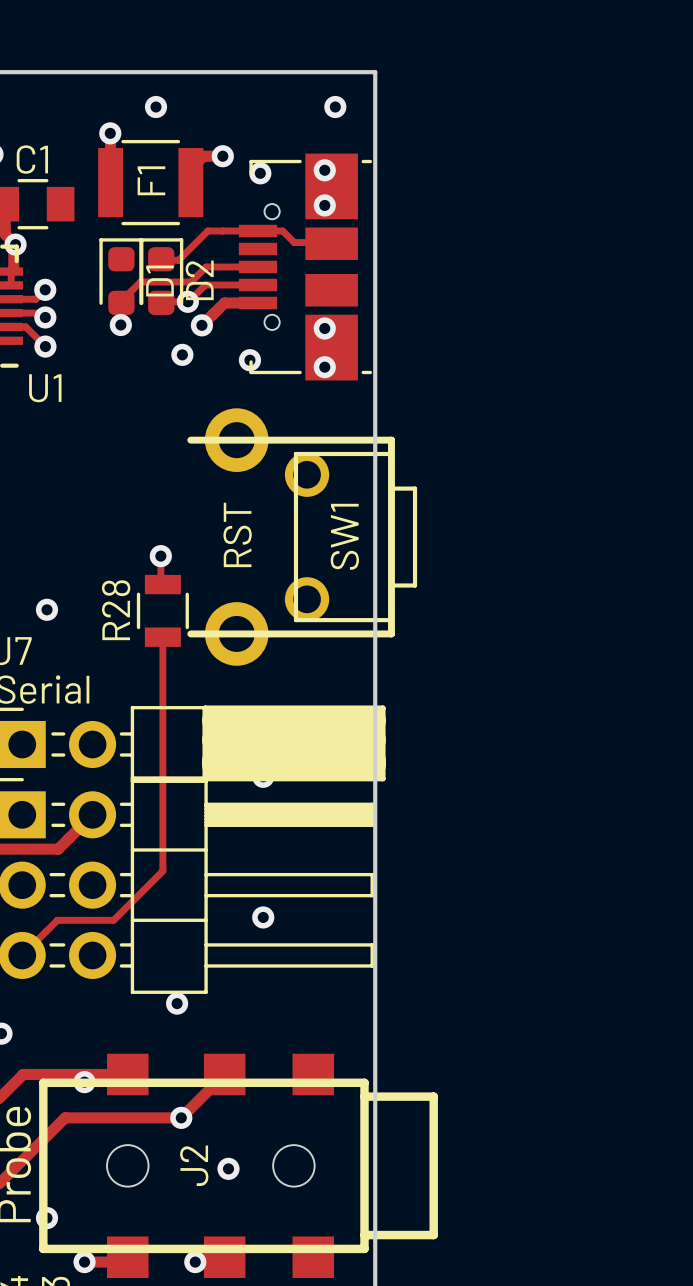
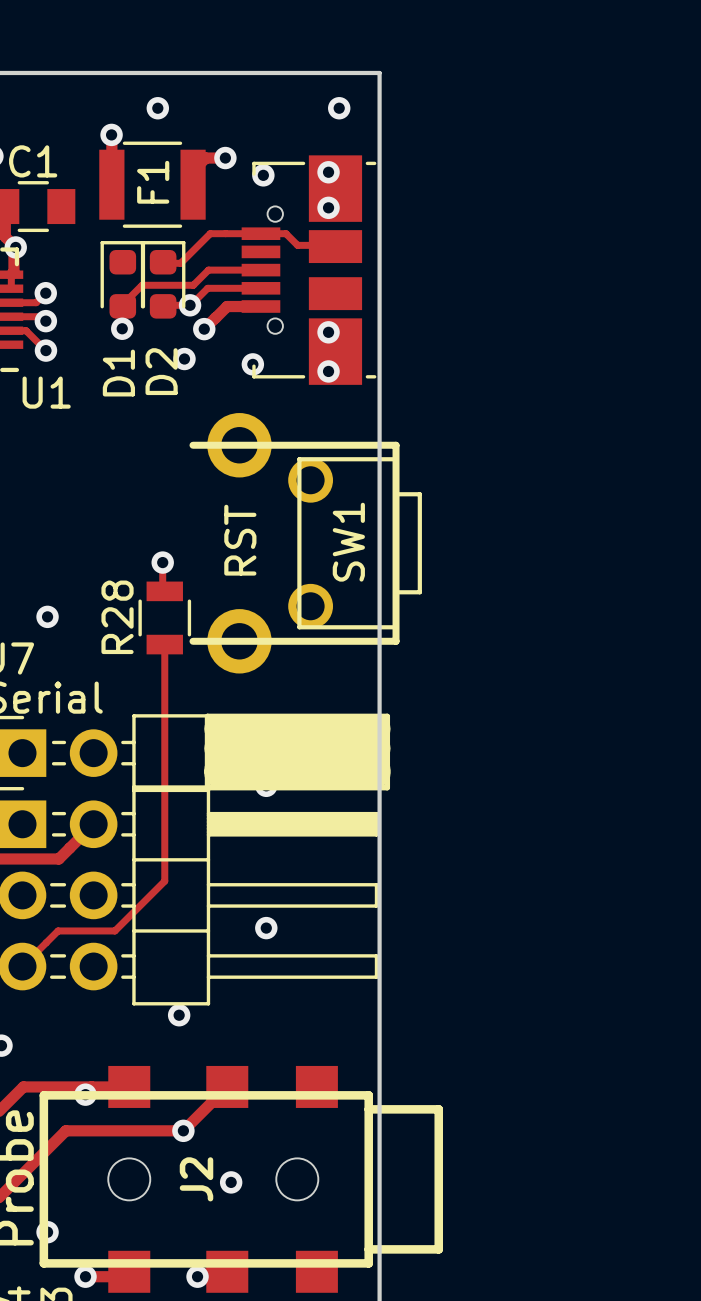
D2 name position: D2 (199, 280) -> D2 (161, 371)
D1 name position: D1 (159, 281) -> D1 (118, 373)

